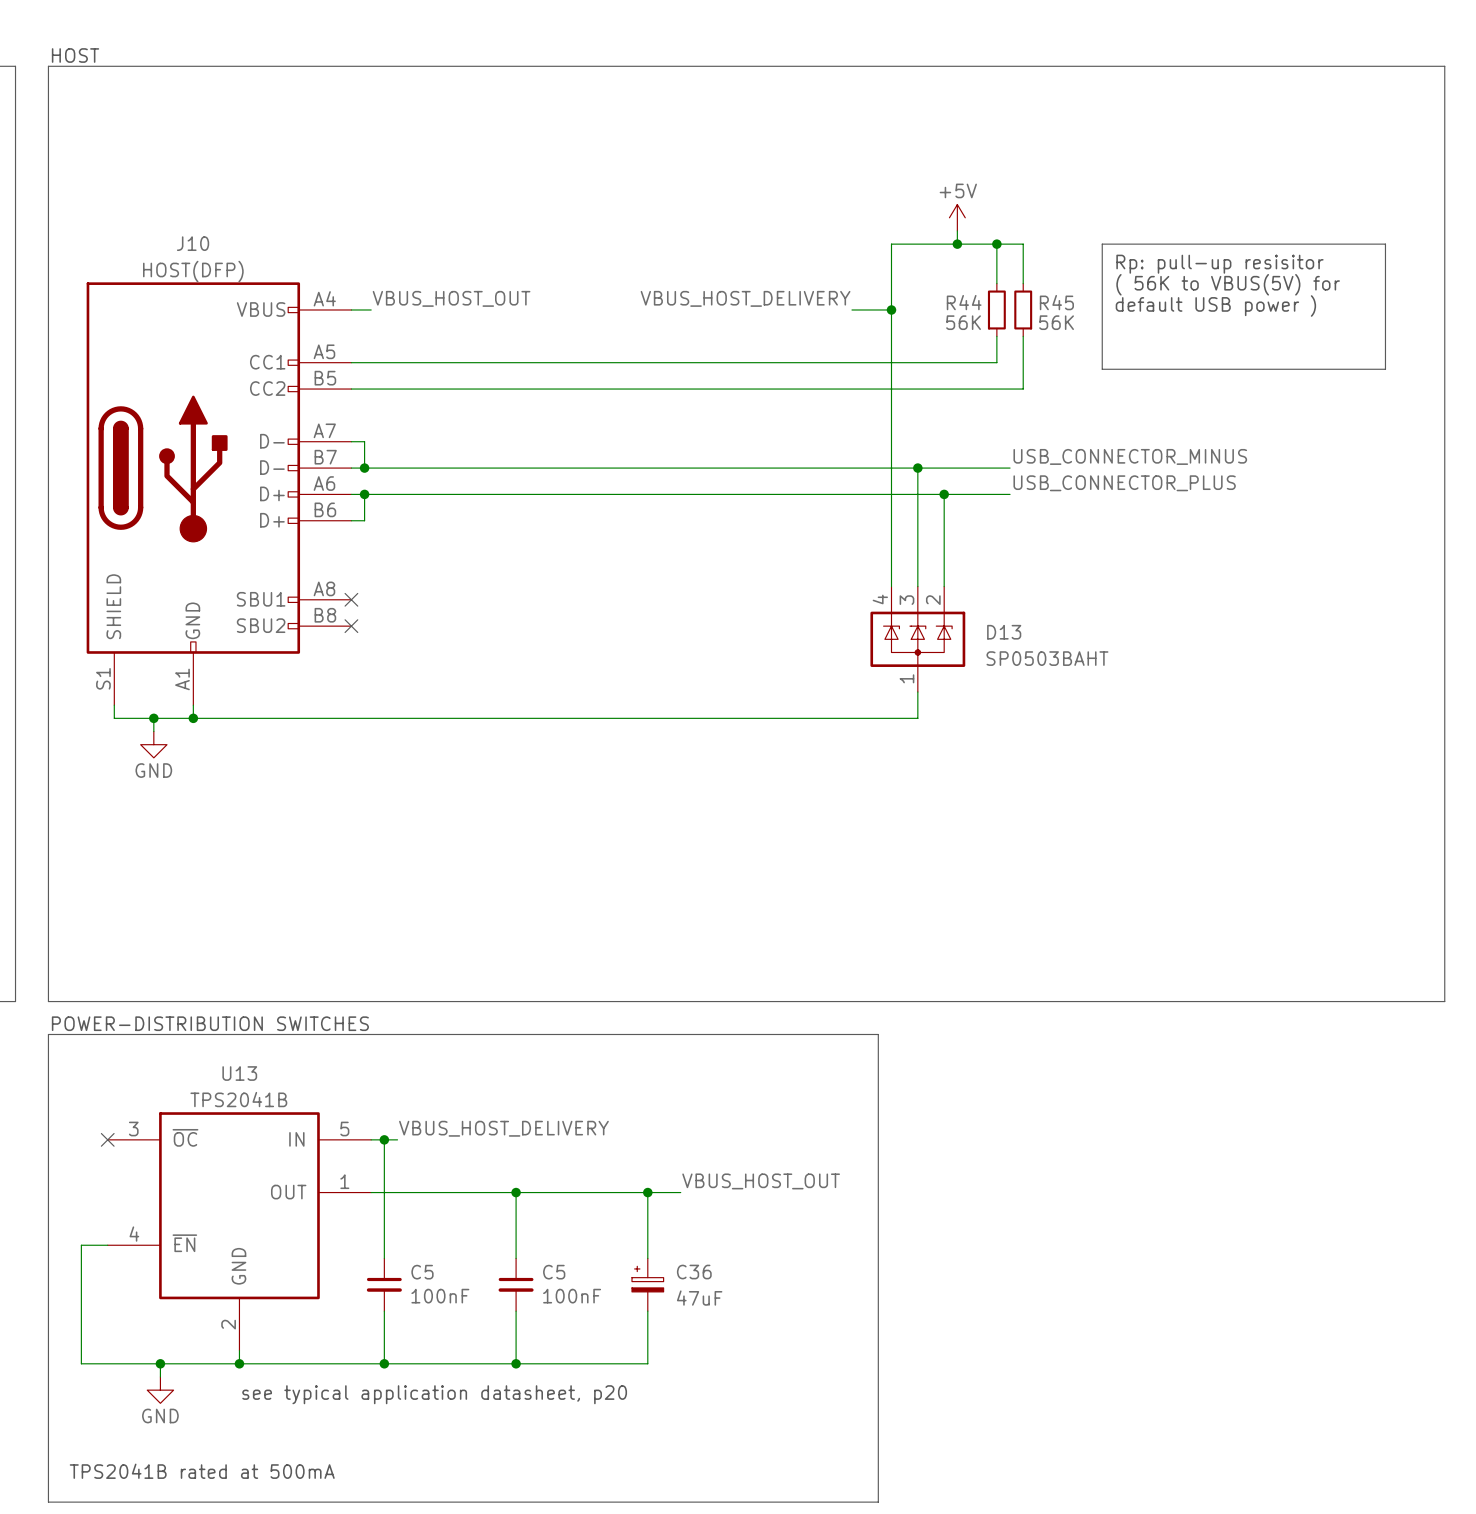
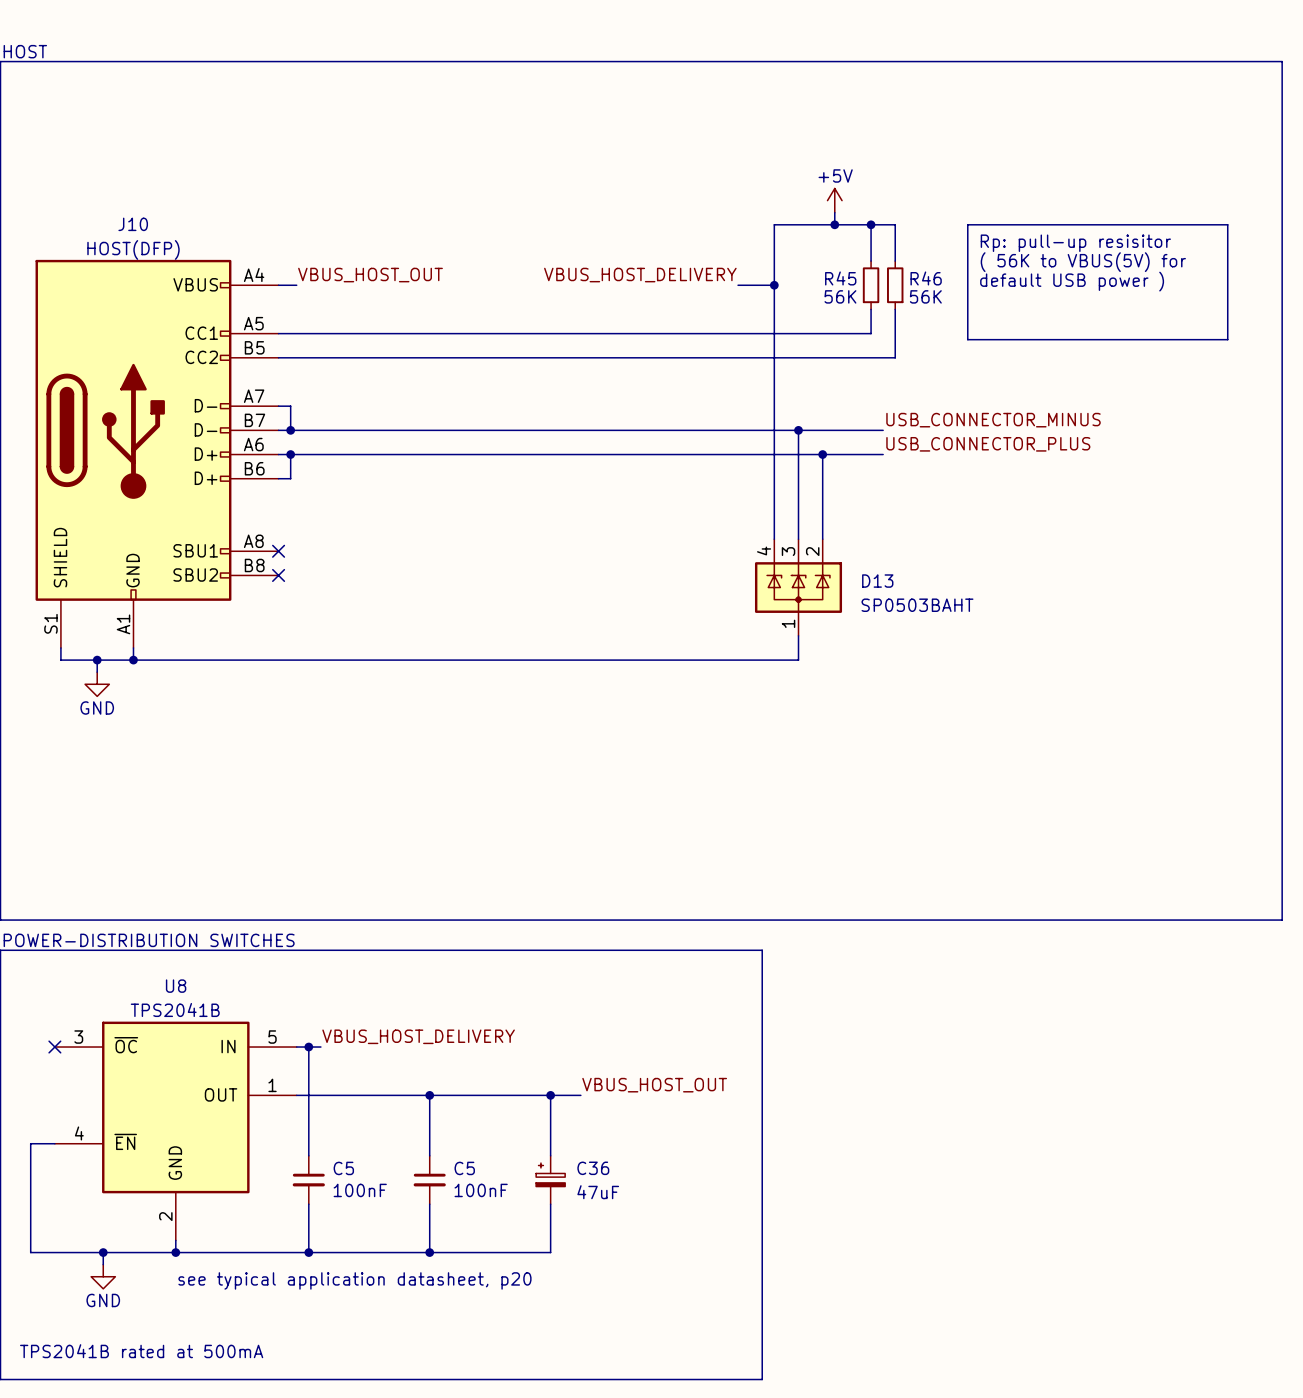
R44 name: R44 (964, 302) -> R45 (840, 278)
R45 name: R45 (1056, 302) -> R46 (926, 278)
U13 name: U13 (239, 1073) -> U8 (176, 986)

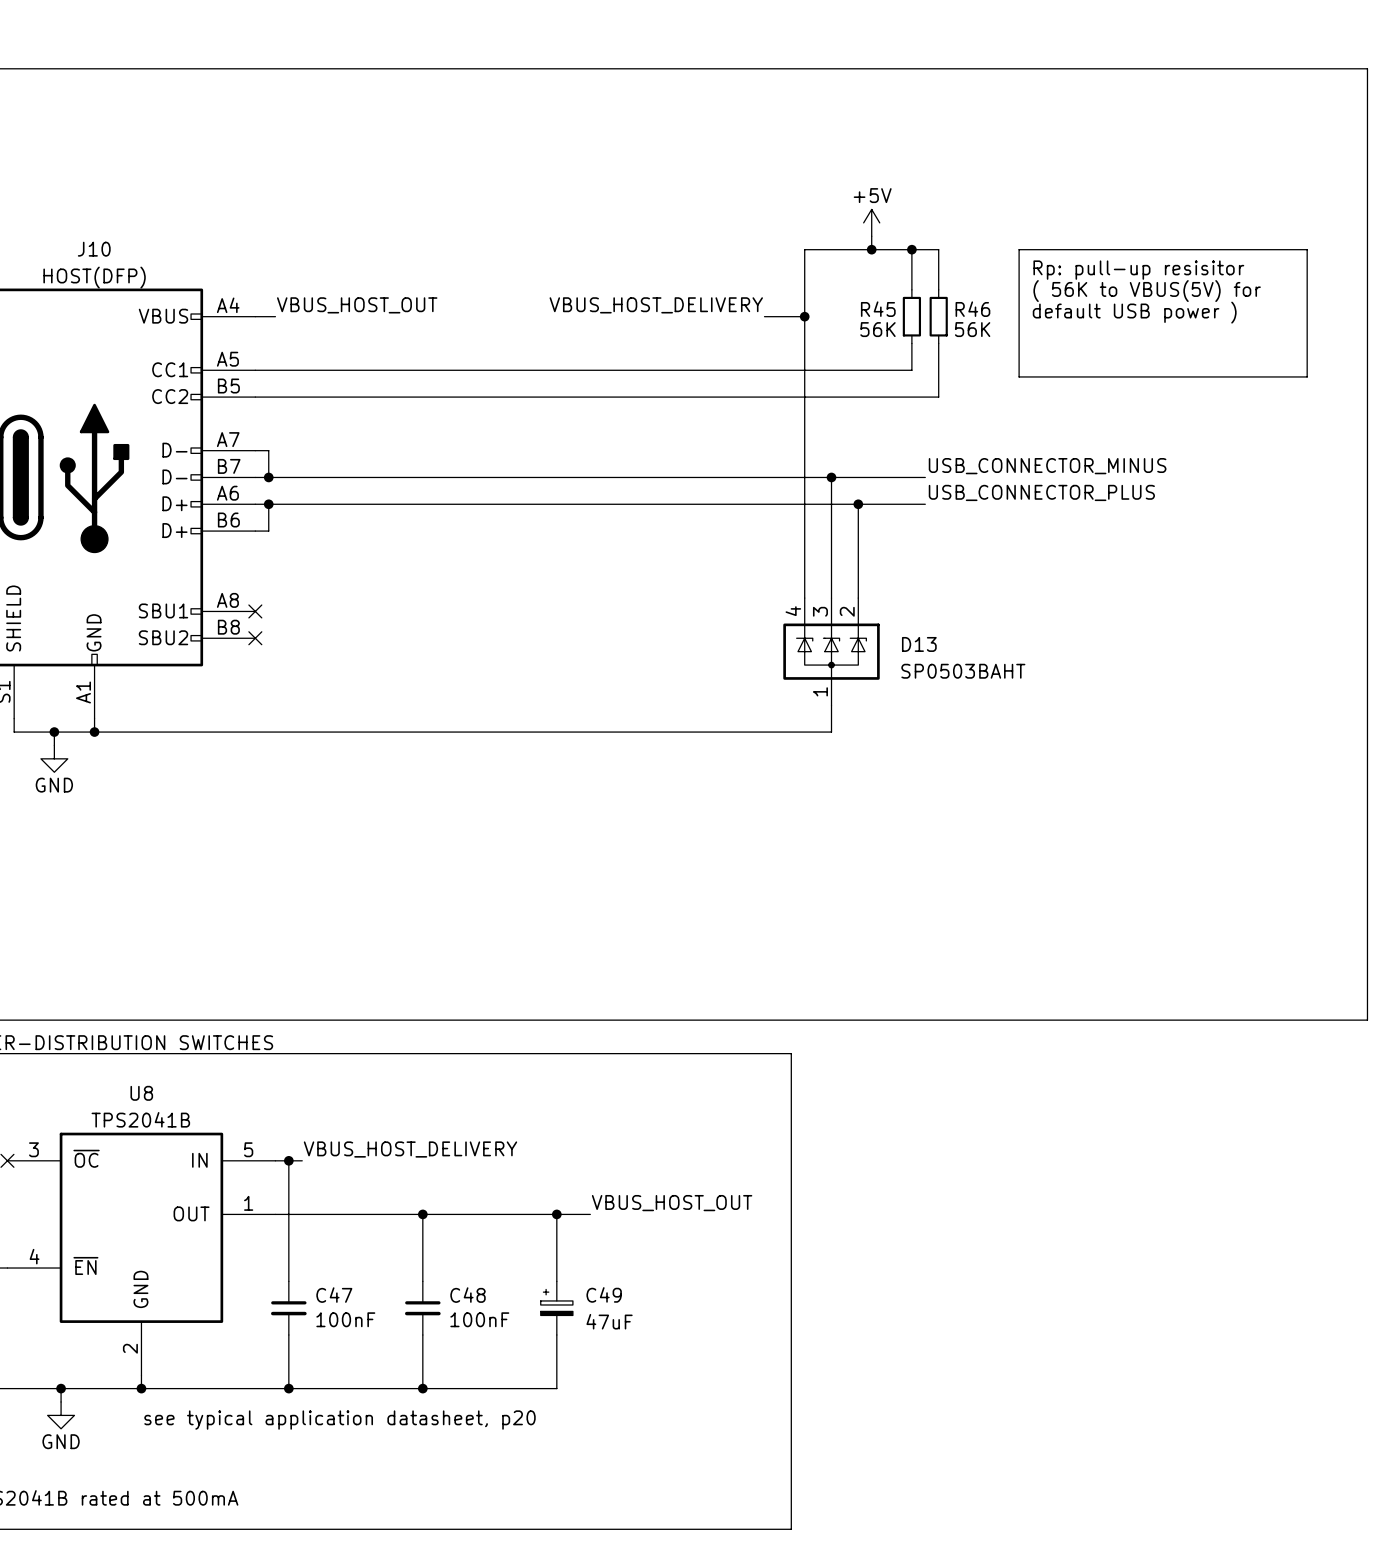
C5 name: C5 (343, 1168) -> C47 (334, 1295)
C5 name: C5 (464, 1168) -> C48 (468, 1295)
C36 name: C36 (593, 1168) -> C49 (604, 1294)

